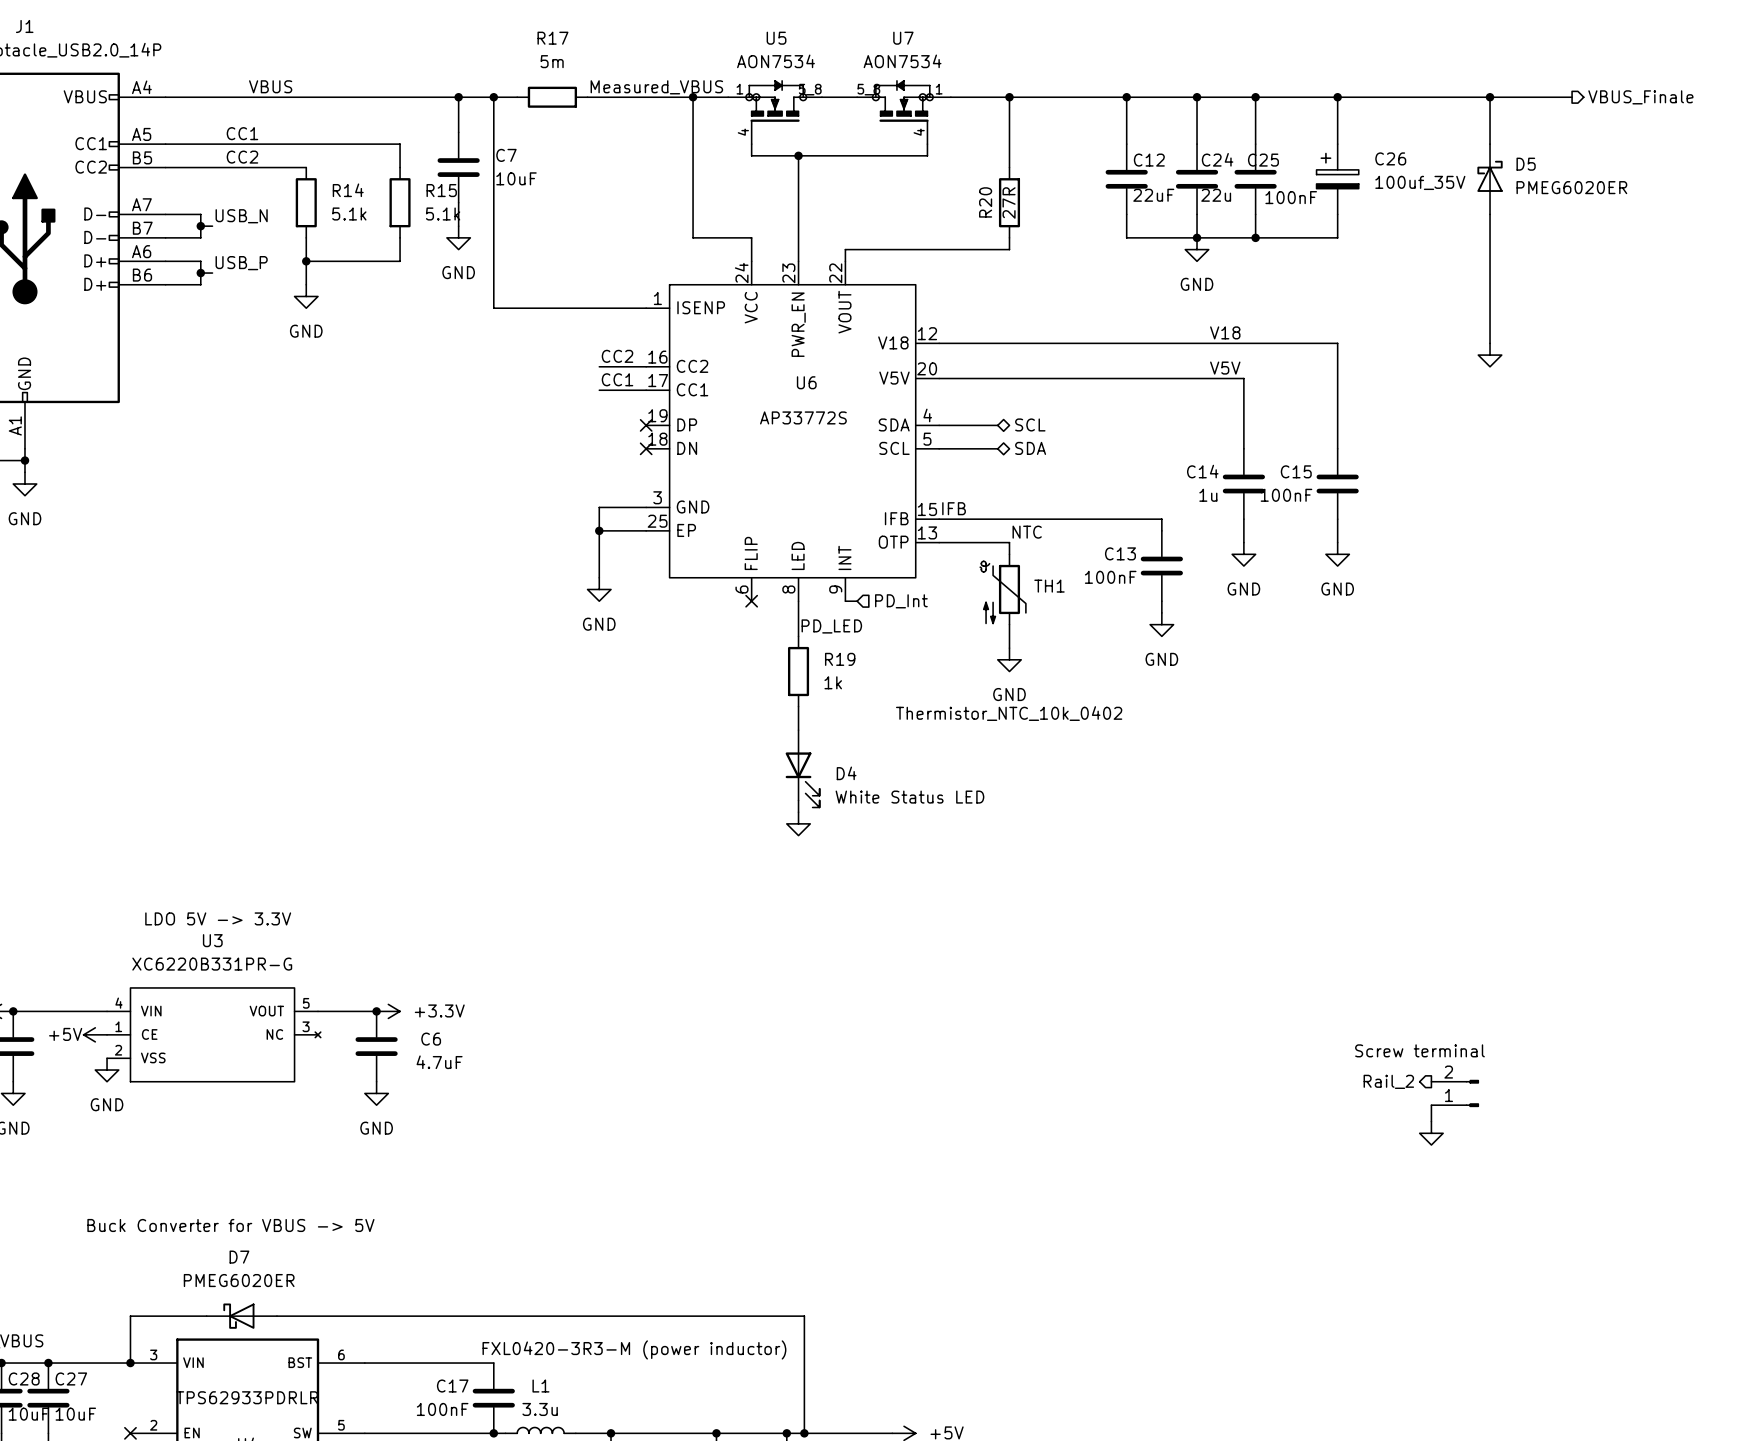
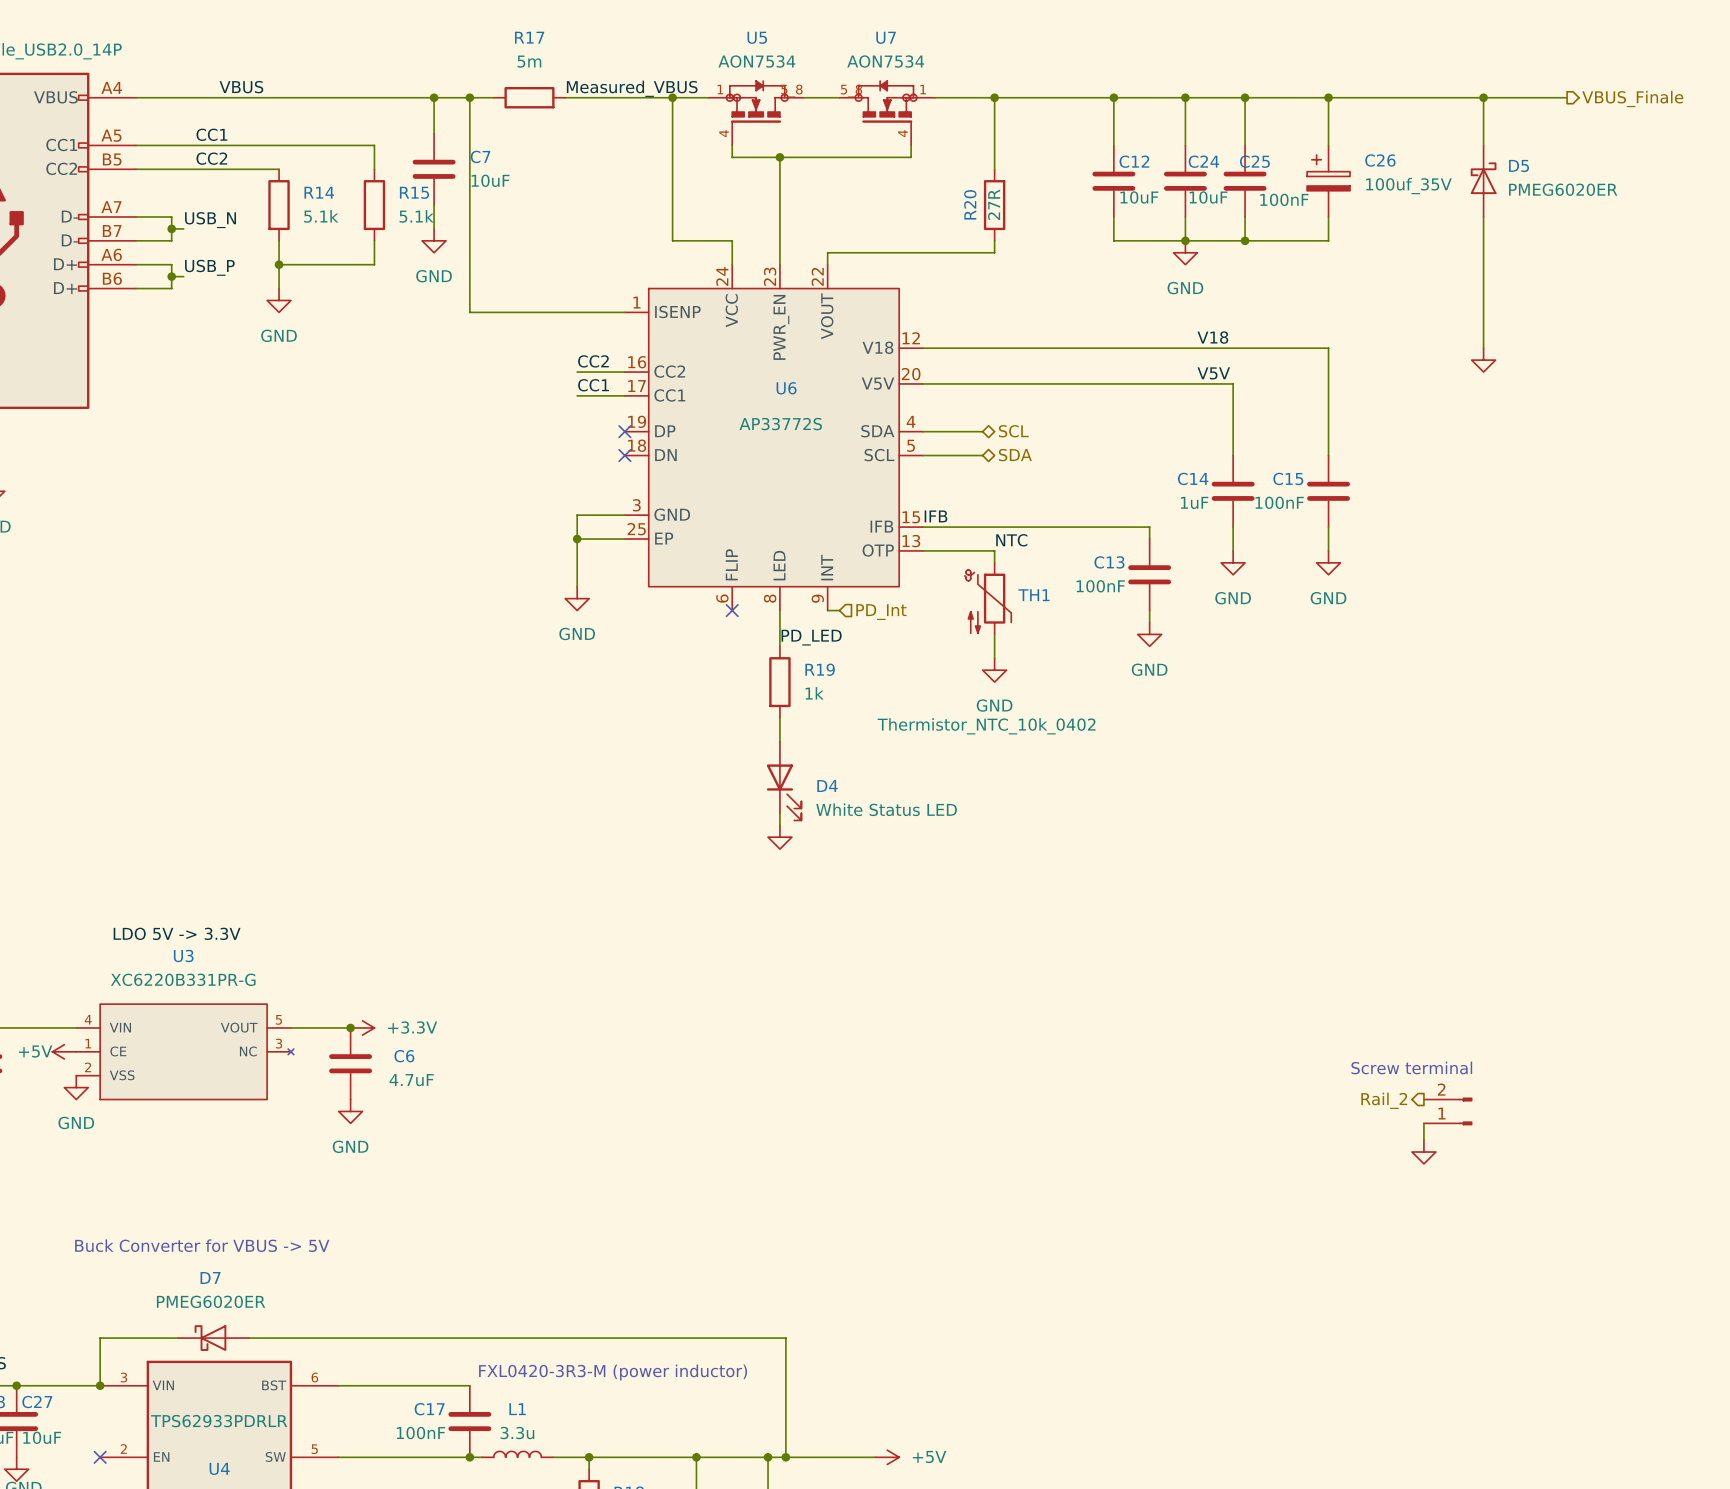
C12 value: 22uF (1153, 195) -> 10uF (1139, 197)
C24 value: 22u (1216, 195) -> 10uF (1208, 197)
C14 value: 1u (1208, 495) -> 1uF (1194, 502)

